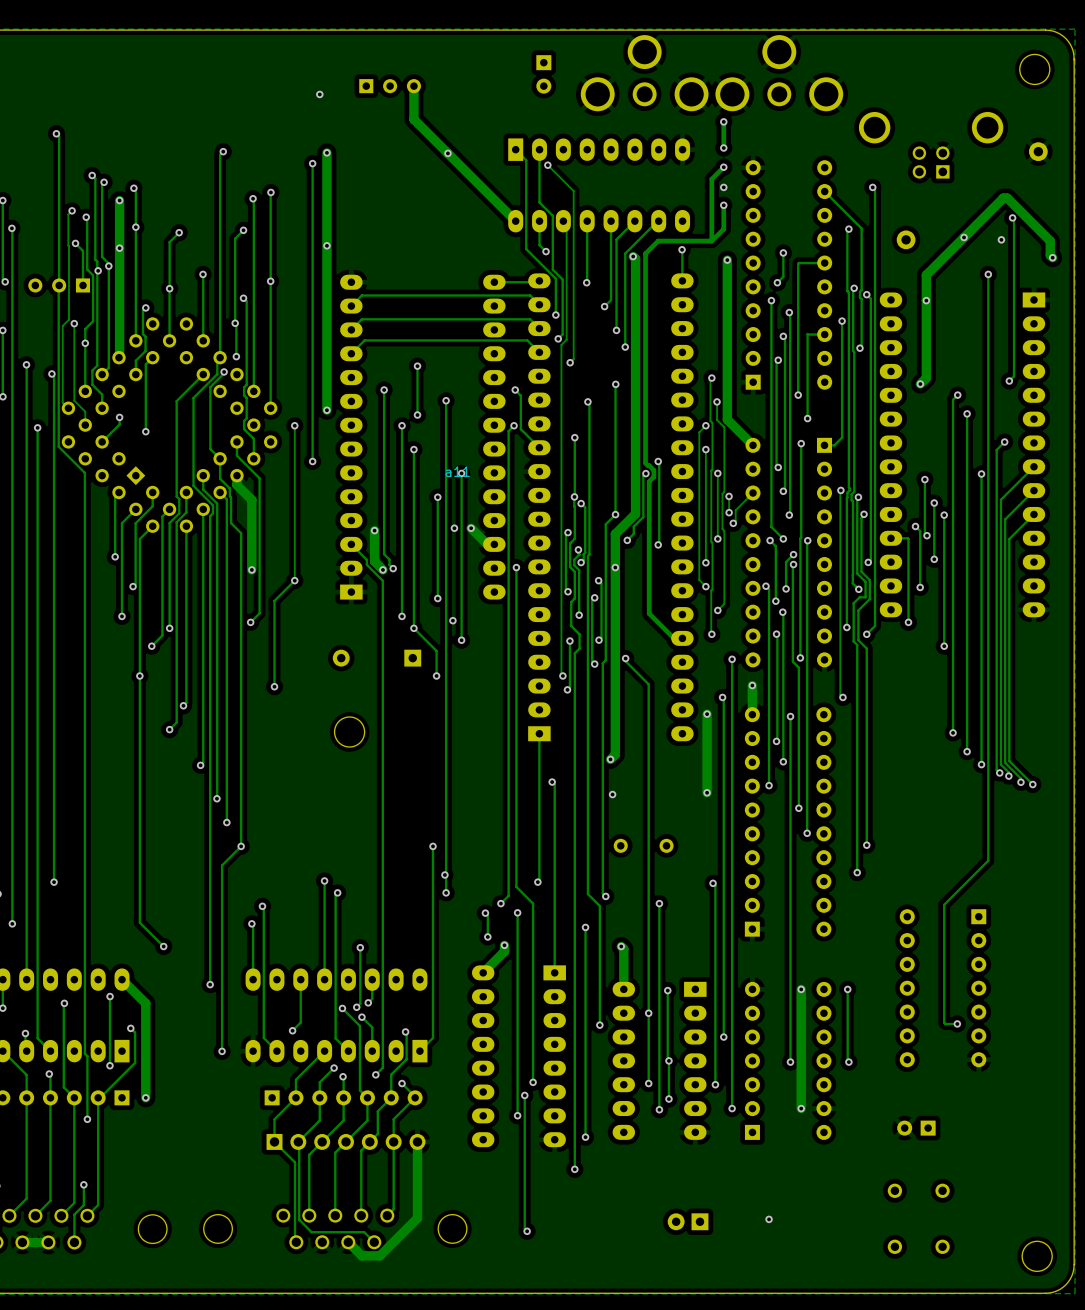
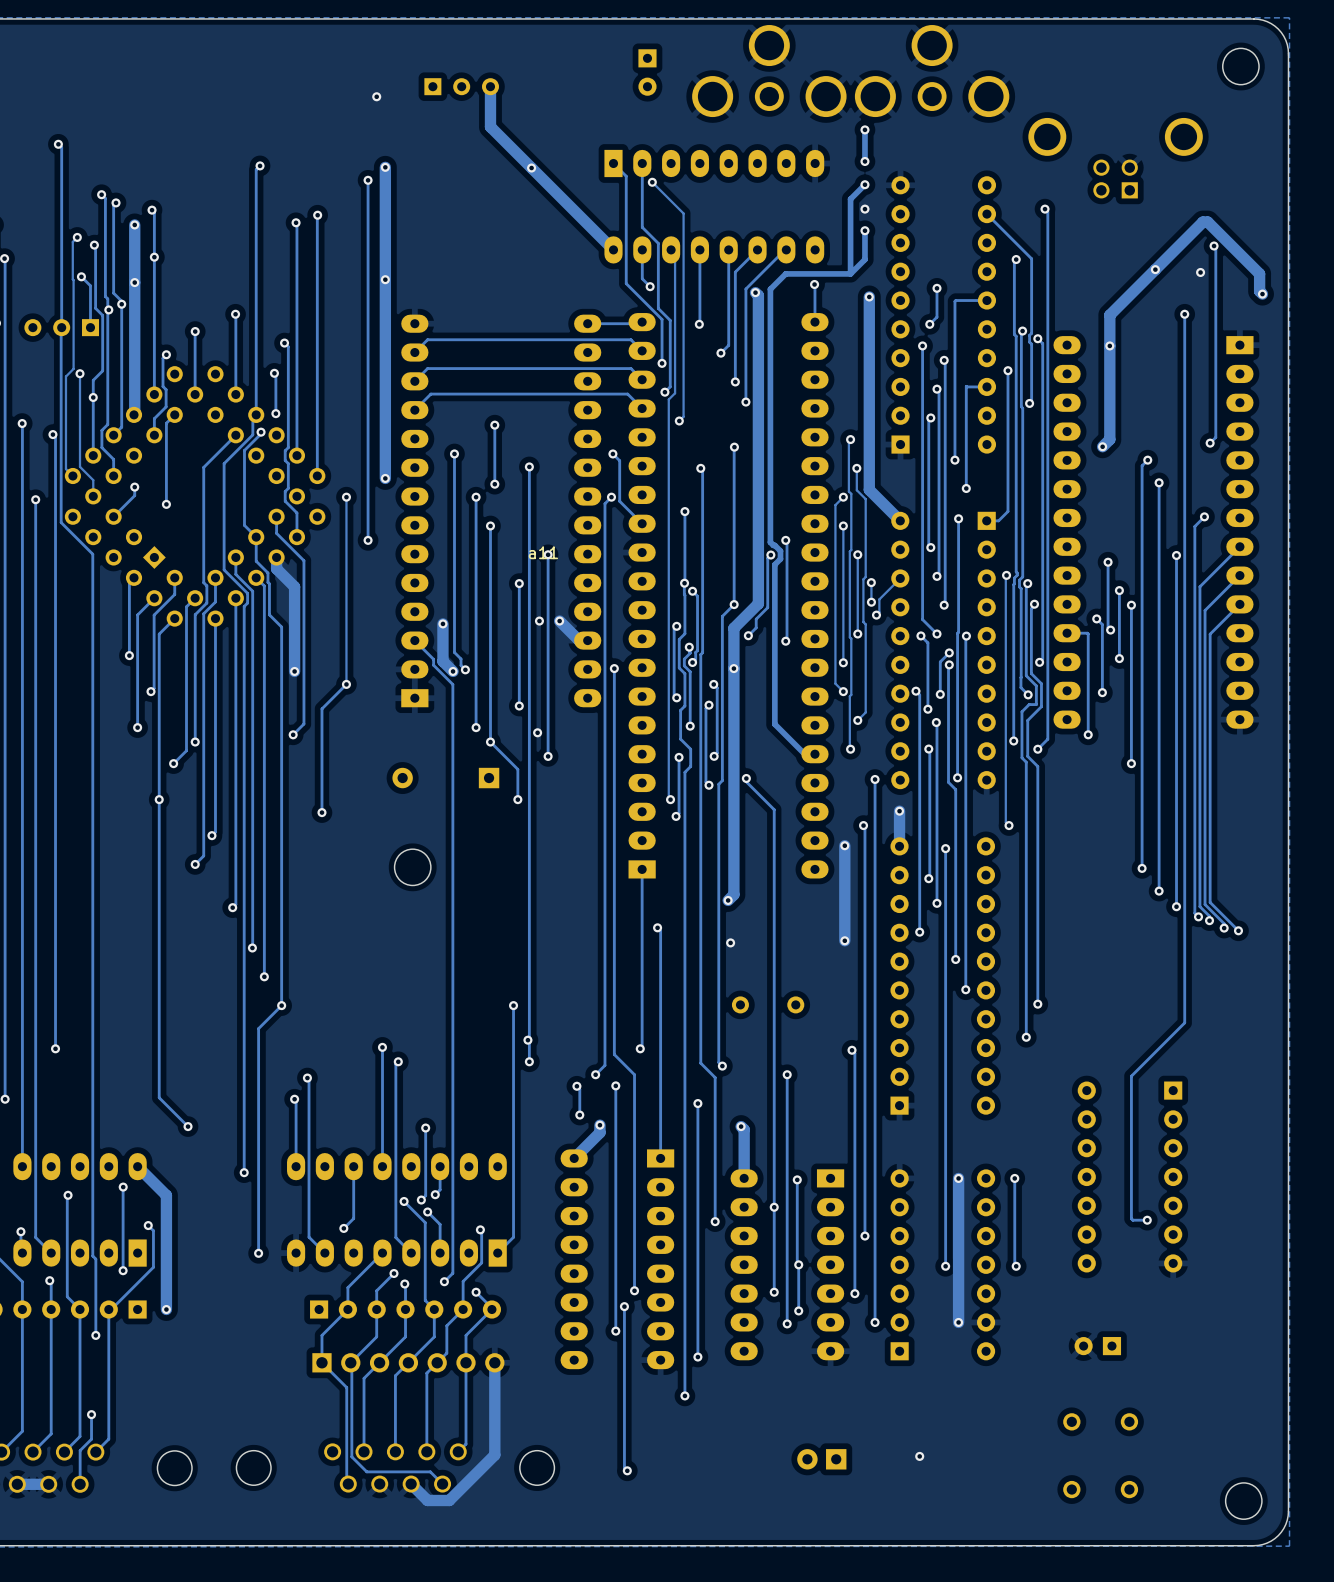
part: (1038, 151) -> none
track: (243, 230) (235, 238) (235, 323) -> none
via: (243, 230) -> none
track: (179, 232) (169, 242) (169, 288) -> none
via: (179, 232) -> none
part: (906, 239) -> none
via: (270, 281) -> none

